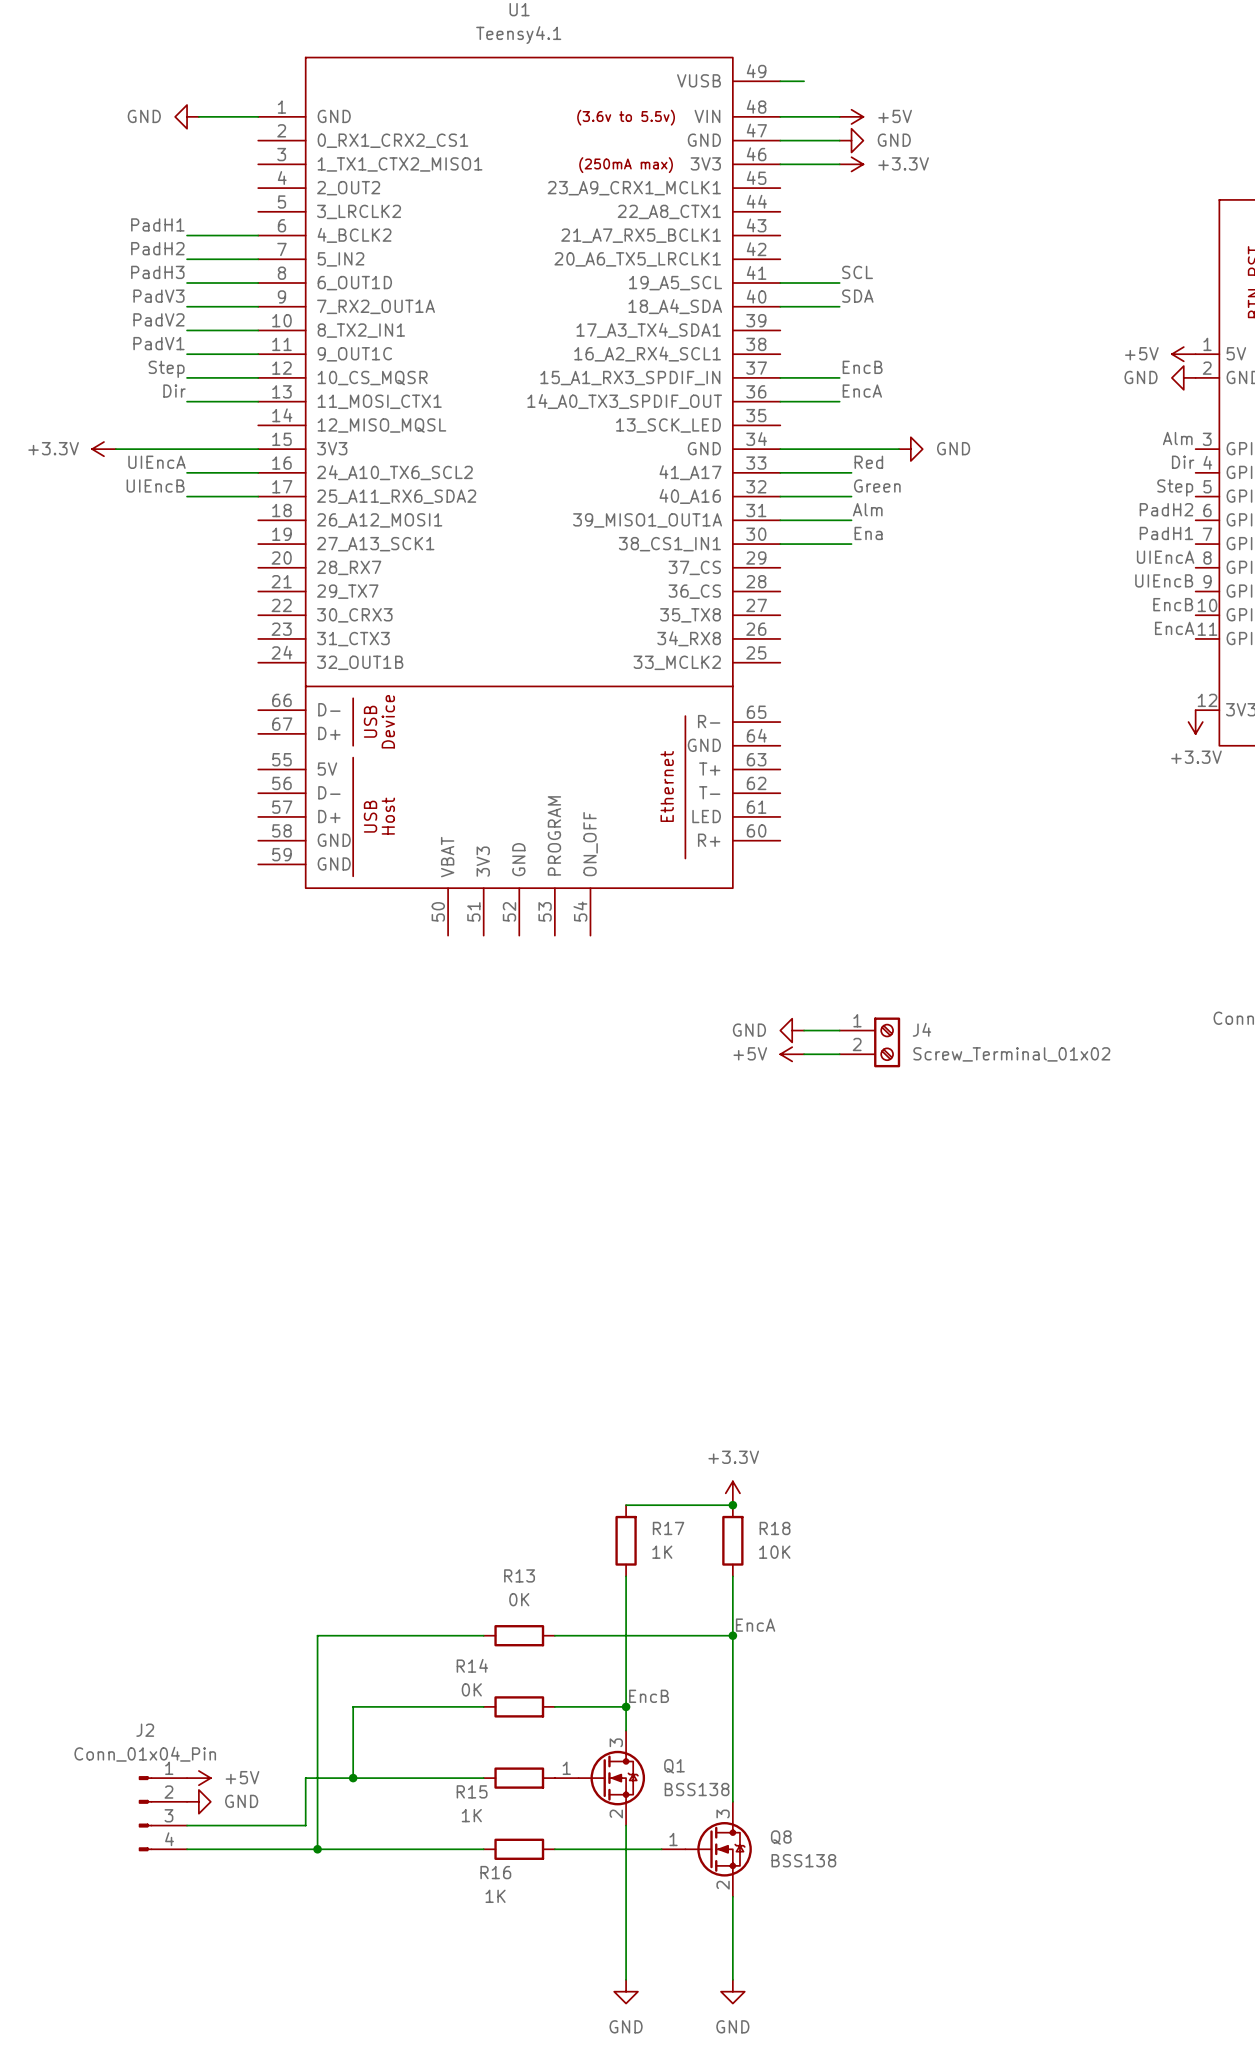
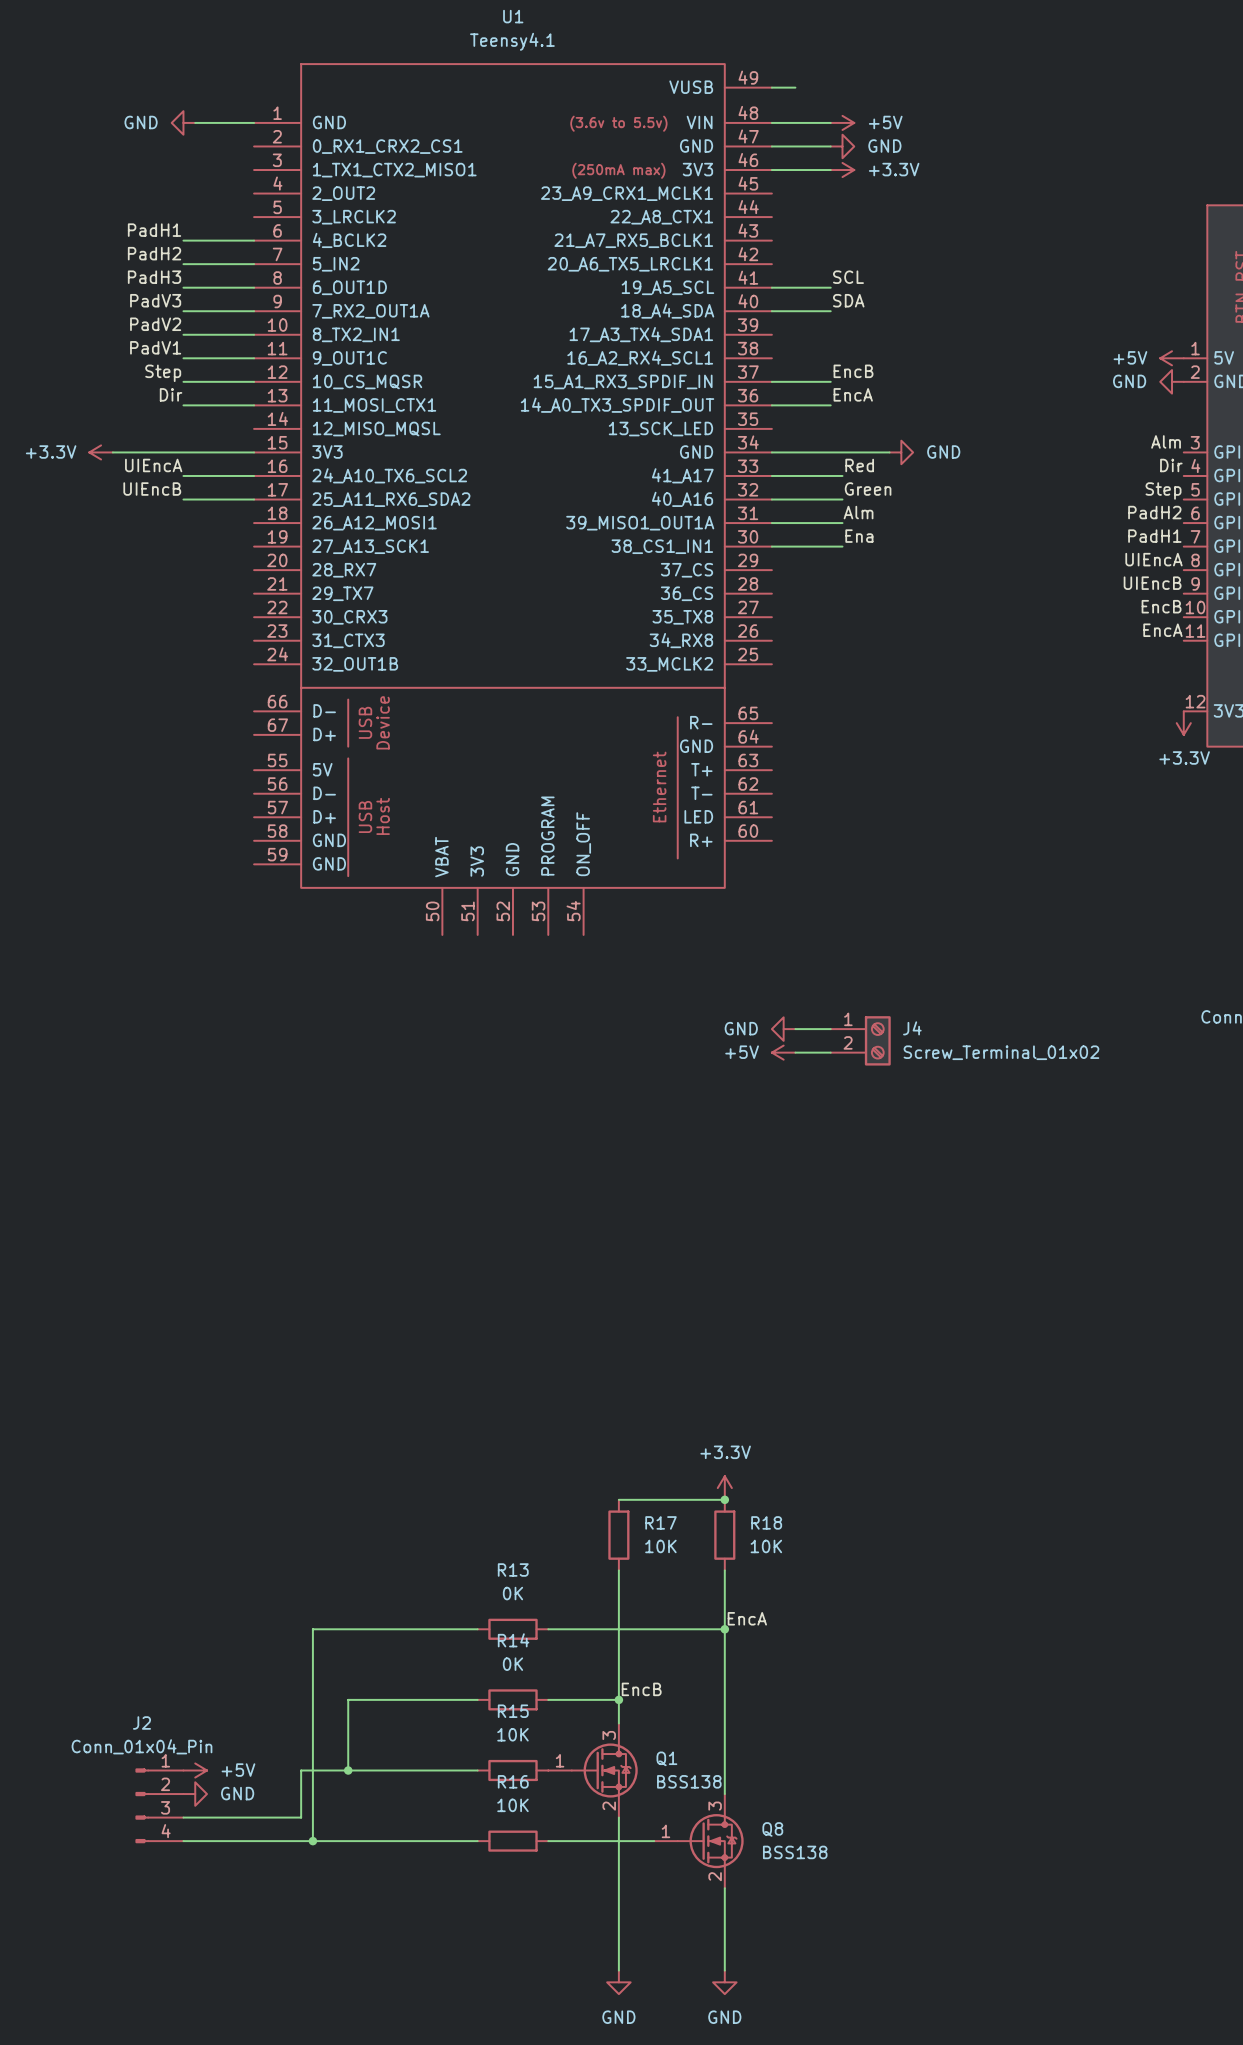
R17 value: 1K (662, 1552) -> 10K (660, 1546)
R14 name position: R14 (472, 1665) -> R14 (513, 1640)
R14 value position: 0K (471, 1689) -> 0K (512, 1664)
R15 name position: R15 (472, 1791) -> R15 (513, 1711)
R15 value: 1K (471, 1815) -> 10K (512, 1734)
R16 name position: R16 (495, 1872) -> R16 (513, 1781)
R16 value: 1K (495, 1896) -> 10K (512, 1805)

